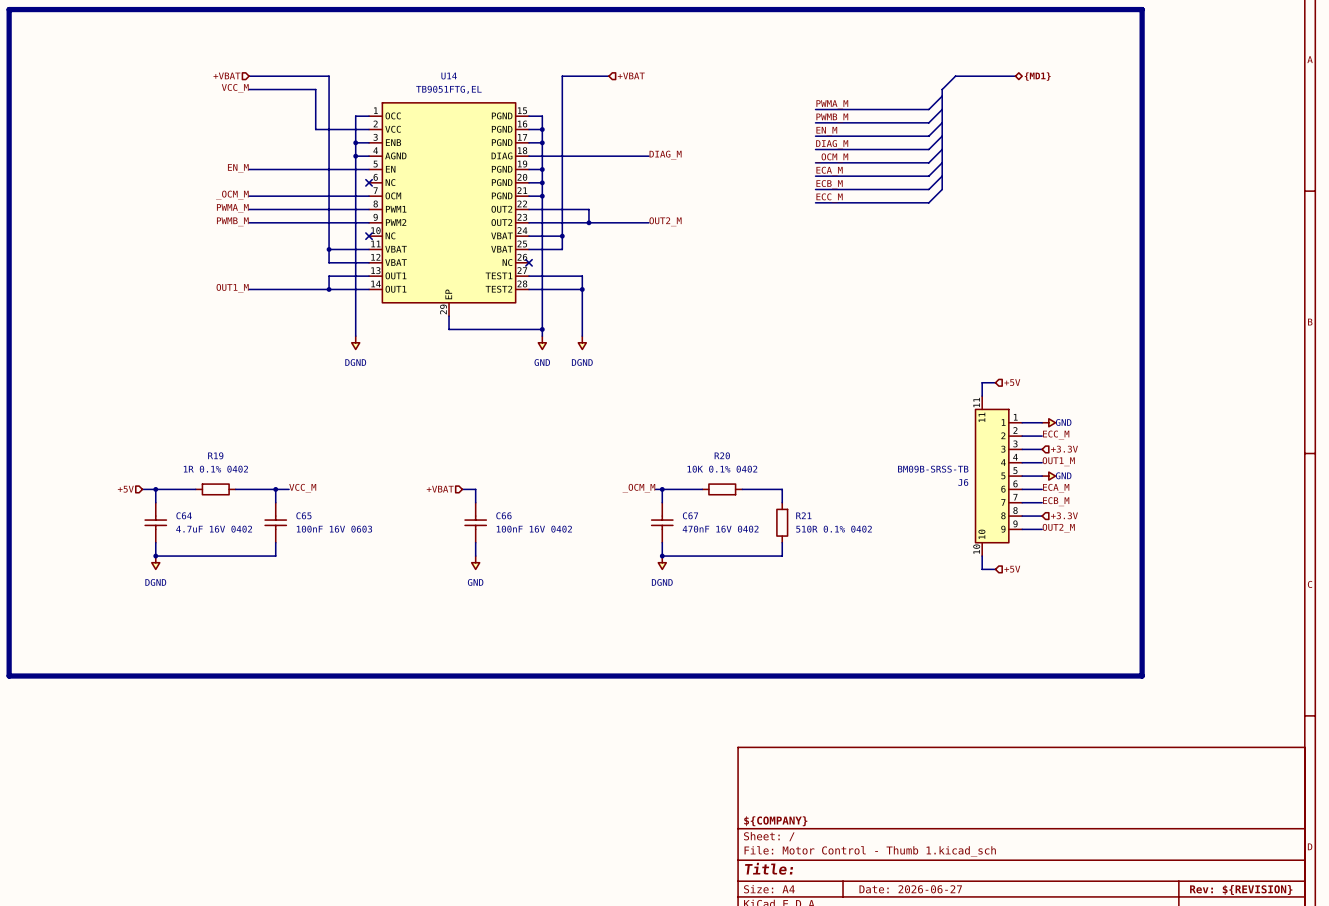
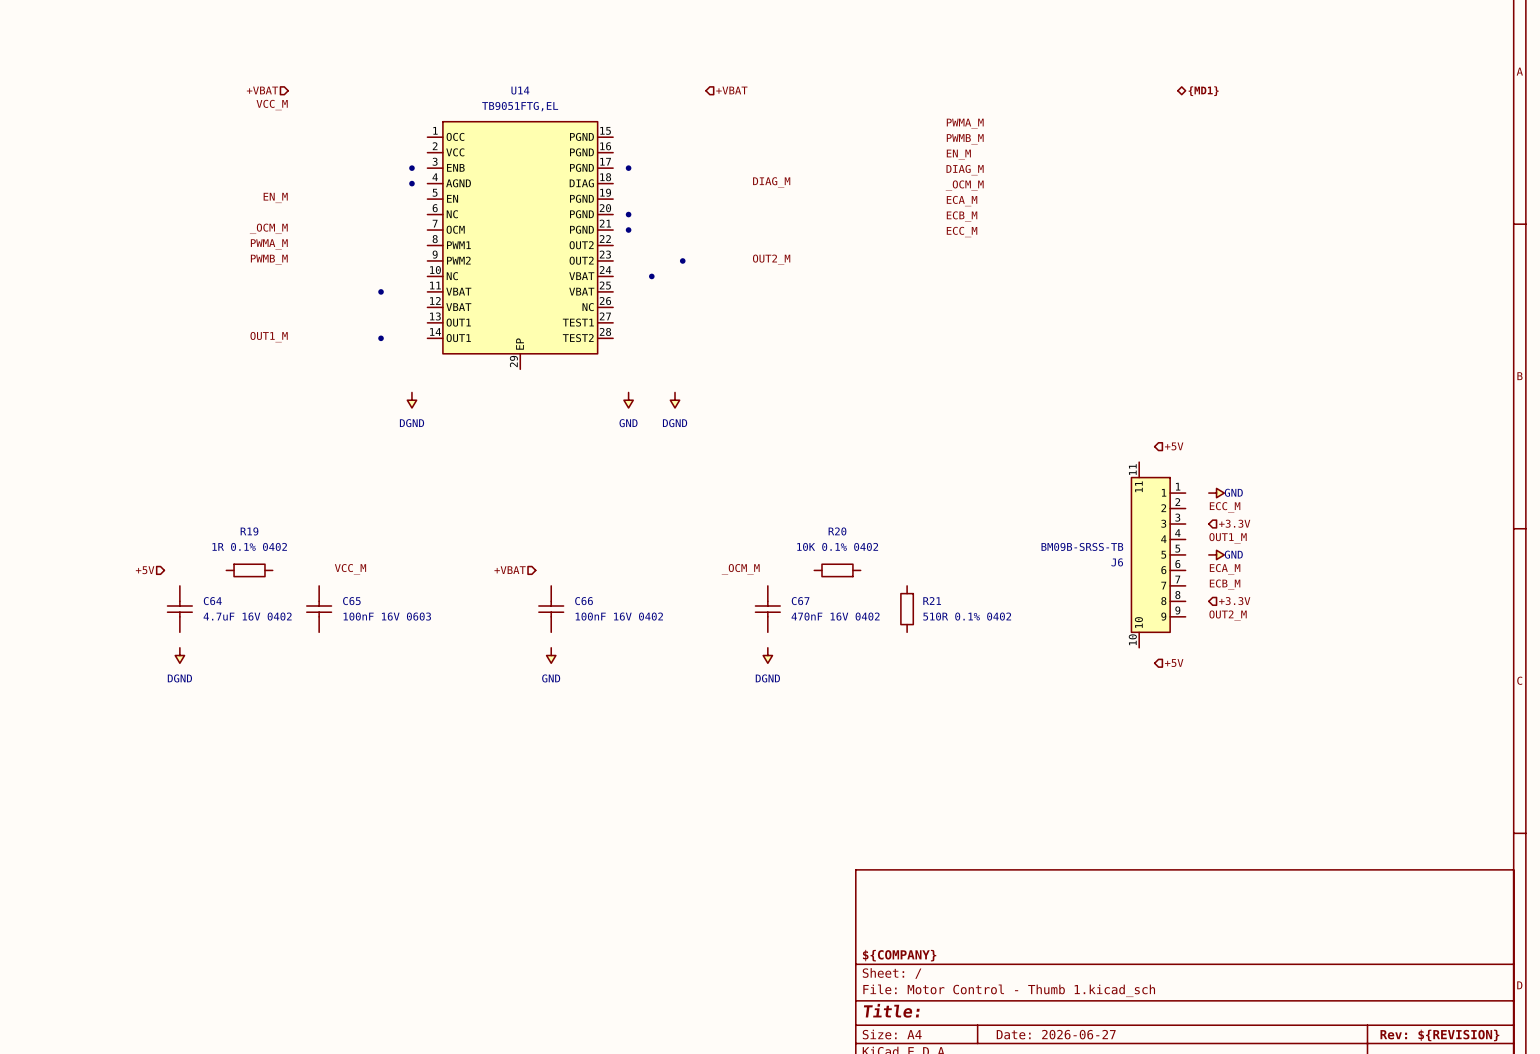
line: (9, 9) (1142, 9) (1142, 676) (9, 676) (9, 9) -> none
wire: (249, 76) (329, 76) (329, 262) (369, 262) -> none
wire: (608, 76) (562, 76) (562, 249) (528, 249) -> none
bus: (1015, 76) (955, 76) (942, 89) (942, 189) -> none
wire: (249, 89) (315, 89) (315, 129) (369, 129) -> none
wire: (942, 96) (928, 109) (815, 109) -> none
wire: (942, 109) (928, 122) (815, 122) -> none
wire: (369, 116) (355, 116) (355, 336) -> none
wire: (528, 116) (542, 116) (542, 336) -> none
wire: (942, 122) (928, 136) (815, 136) -> none
wire: (528, 129) (542, 129) -> none
junction: (542, 129) -> none
wire: (942, 136) (928, 149) (815, 149) -> none
wire: (355, 142) (369, 142) -> none
wire: (528, 142) (542, 142) -> none
wire: (942, 149) (928, 162) (815, 162) -> none
wire: (355, 156) (369, 156) -> none
wire: (528, 156) (648, 156) -> none
wire: (942, 162) (928, 176) (815, 176) -> none
wire: (249, 169) (369, 169) -> none
wire: (528, 169) (542, 169) -> none
junction: (542, 169) -> none
wire: (942, 176) (928, 189) (815, 189) -> none
no-connect mark: (369, 182) -> none
wire: (528, 182) (542, 182) -> none
wire: (942, 189) (928, 202) (815, 202) -> none
wire: (249, 196) (369, 196) -> none
wire: (528, 196) (542, 196) -> none
wire: (249, 209) (369, 209) -> none
wire: (528, 209) (588, 209) (588, 222) -> none
wire: (249, 222) (369, 222) -> none
wire: (528, 222) (648, 222) -> none
no-connect mark: (369, 236) -> none
wire: (528, 236) (562, 236) -> none
wire: (329, 249) (369, 249) -> none
no-connect mark: (528, 262) -> none
wire: (369, 276) (329, 276) (329, 289) -> none
wire: (528, 276) (582, 276) (582, 336) -> none
wire: (249, 289) (369, 289) -> none
wire: (528, 289) (582, 289) -> none
junction: (582, 289) -> none
wire: (449, 316) (449, 329) (542, 329) -> none
junction: (542, 329) -> none
wire: (995, 382) (982, 382) (982, 396) -> none
wire: (1022, 422) (1042, 422) -> none
wire: (1022, 436) (1042, 436) -> none
wire: (1022, 449) (1042, 449) -> none
wire: (1022, 462) (1042, 462) -> none
wire: (1022, 476) (1042, 476) -> none
wire: (142, 489) (195, 489) -> none
wire: (155, 489) (155, 502) -> none
junction: (155, 489) -> none
wire: (235, 489) (289, 489) -> none
wire: (275, 489) (275, 502) -> none
junction: (275, 489) -> none
wire: (462, 489) (475, 489) (475, 502) -> none
wire: (655, 489) (702, 489) -> none
wire: (662, 489) (662, 502) -> none
junction: (662, 489) -> none
wire: (742, 489) (782, 489) (782, 502) -> none
wire: (1022, 489) (1042, 489) -> none
wire: (1022, 502) (1042, 502) -> none
wire: (1022, 516) (1042, 516) -> none
wire: (1022, 529) (1042, 529) -> none
wire: (155, 542) (155, 556) (275, 556) (275, 542) -> none
wire: (475, 542) (475, 556) -> none
wire: (662, 542) (662, 556) (782, 556) (782, 542) -> none
junction: (155, 556) -> none
junction: (662, 556) -> none
wire: (982, 556) (982, 569) (995, 569) -> none

